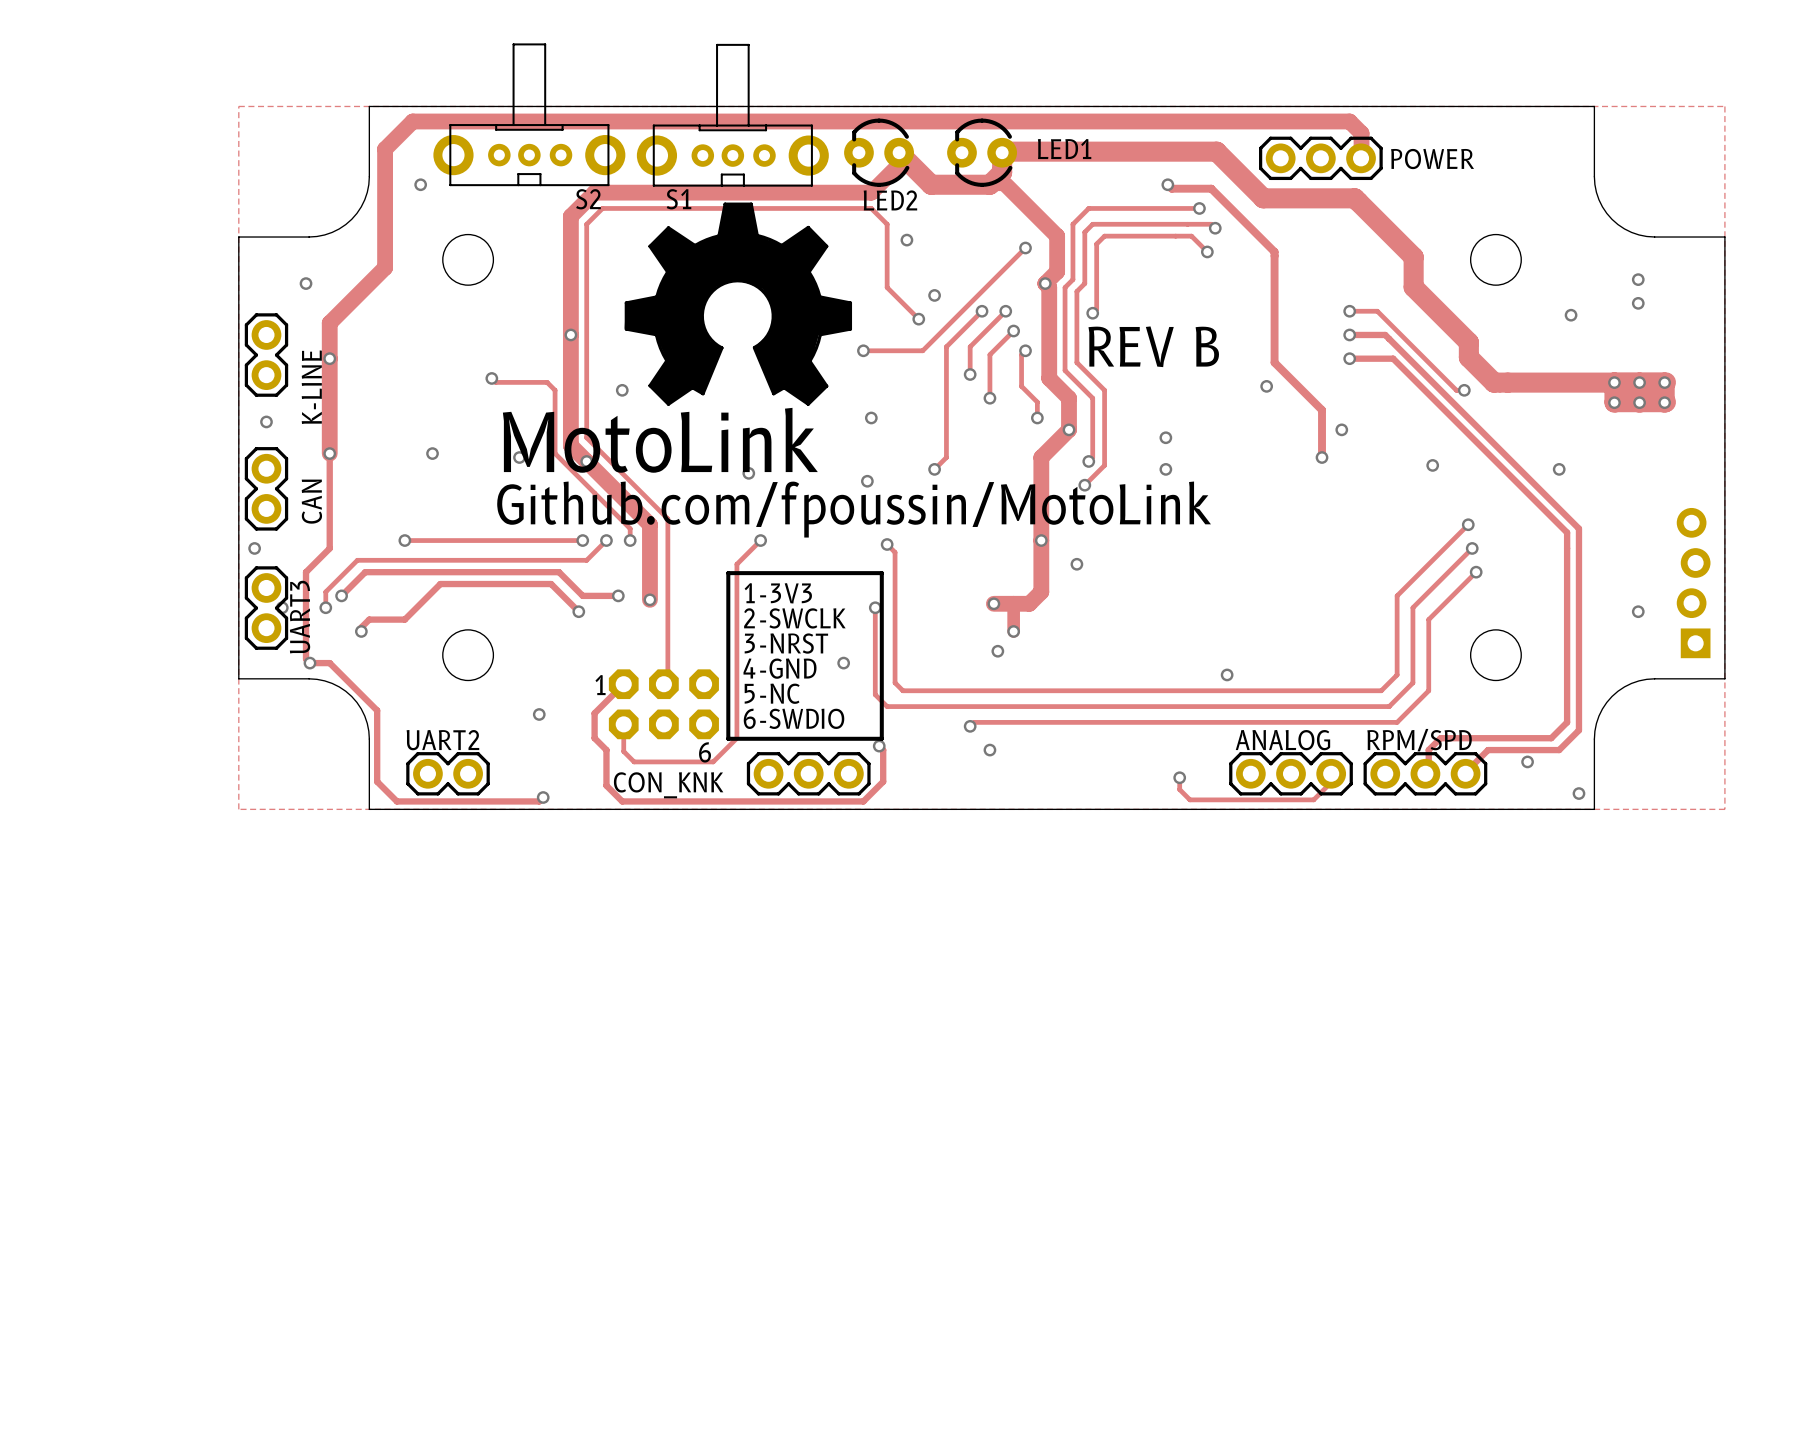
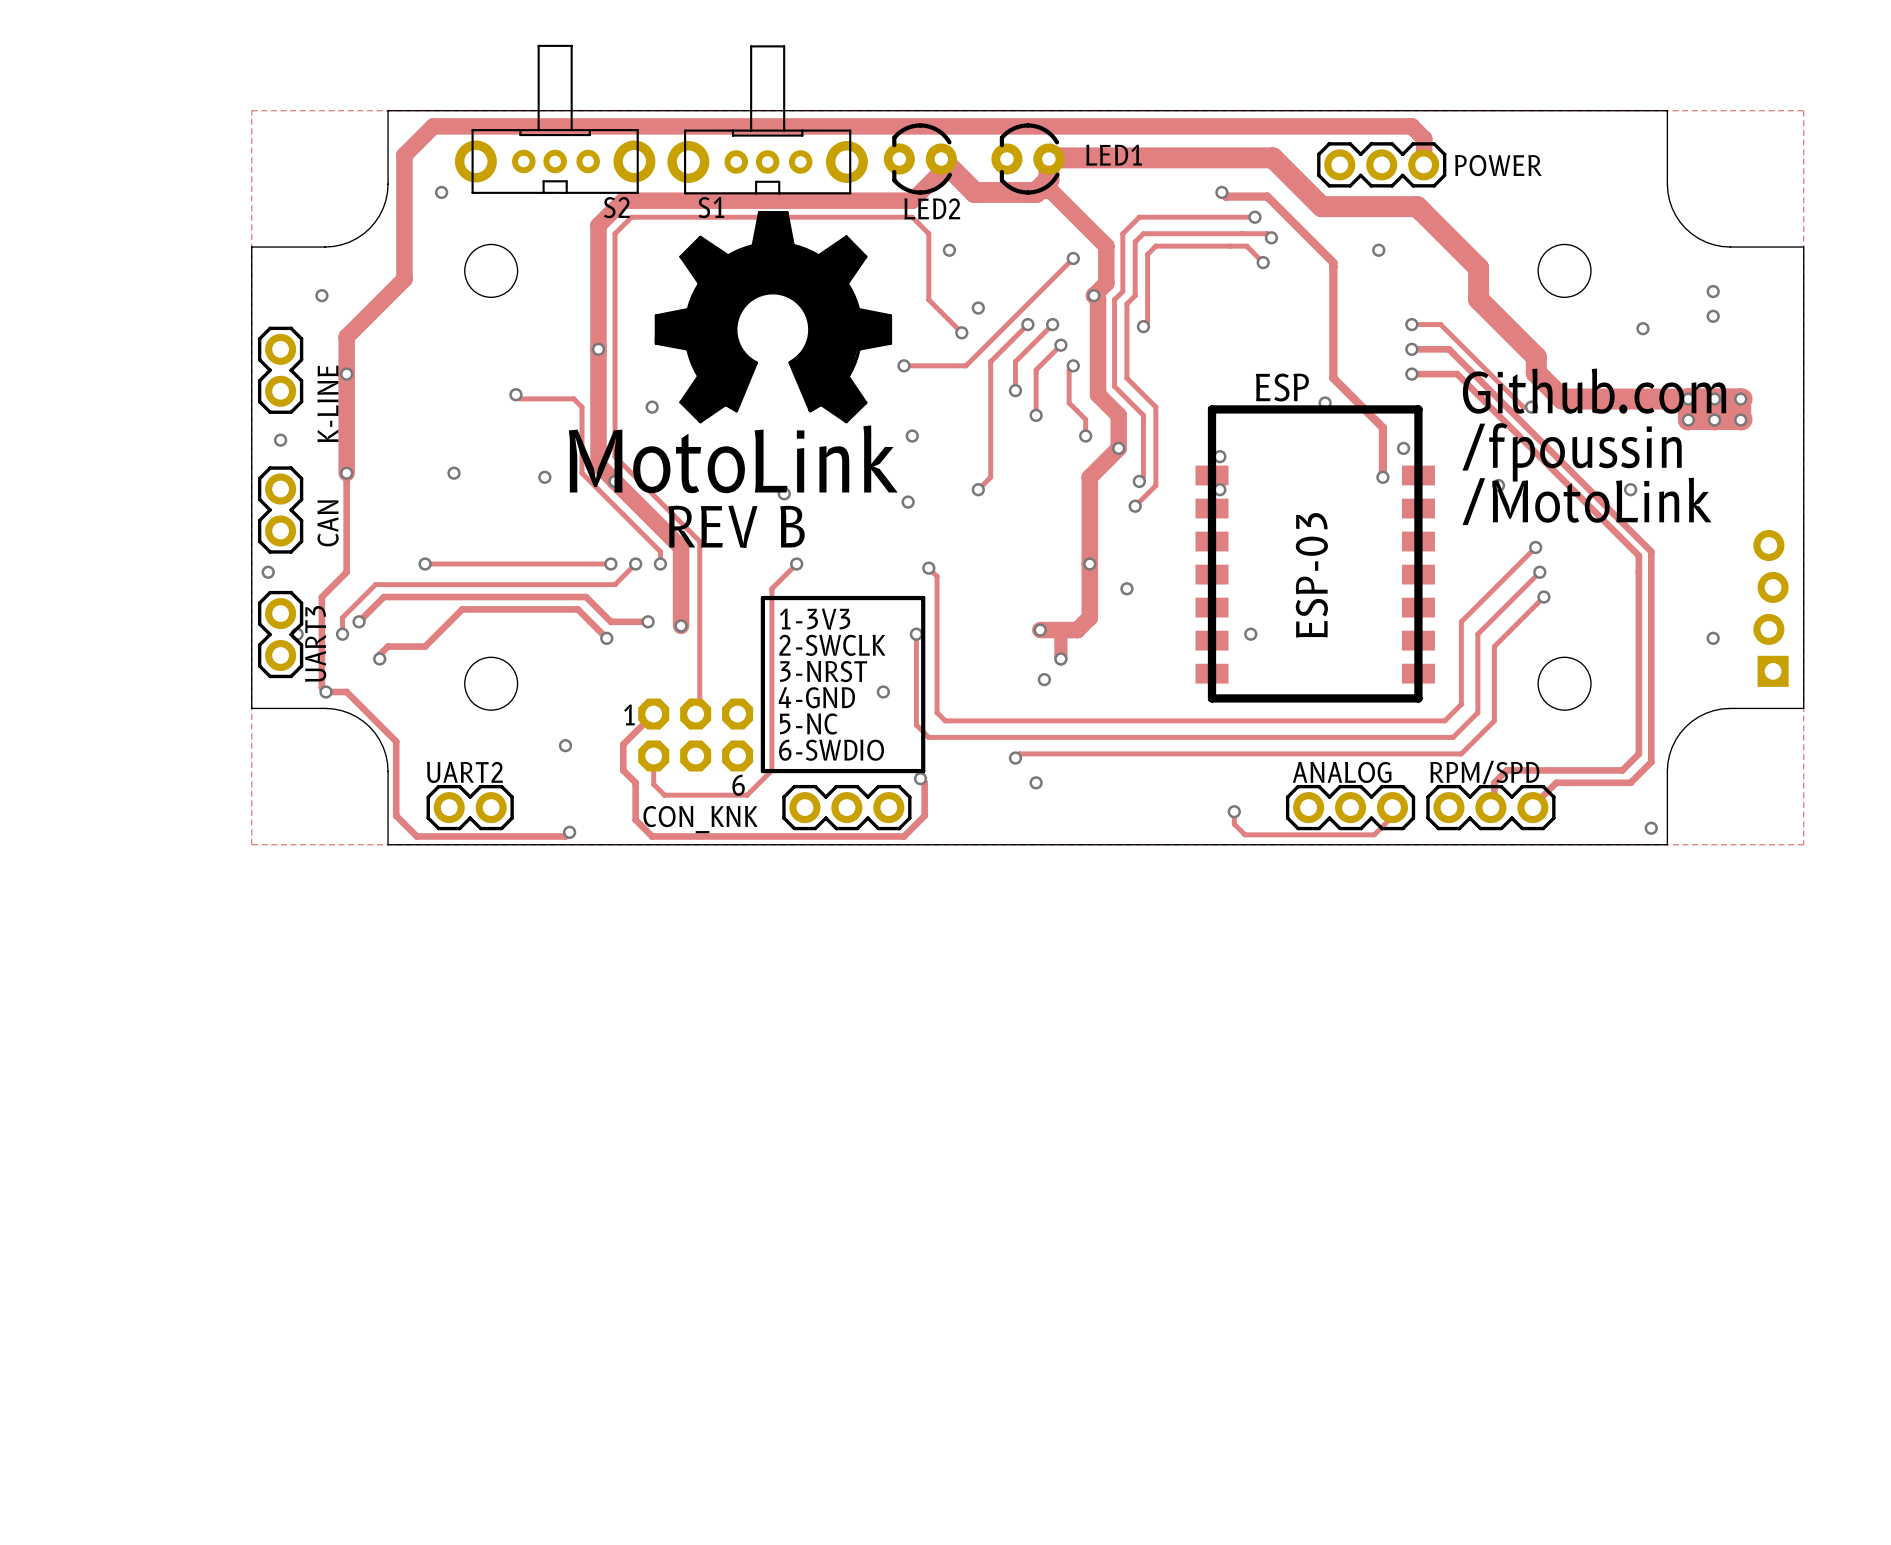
via: none -> (1378, 250)
text: REV B (1153, 346) -> none
text: none -> Github.com (1594, 391)
text: none -> /fpoussin (1572, 452)
text position: MotoLink (660, 440) -> MotoLink (733, 459)
text: none -> /MotoLink (1587, 501)
text: none -> REV B (736, 526)
text: Github.com/fpoussin/MotoLink (854, 509) -> none
ESP: none -> (1315, 553)
via position: (1227, 674) -> (1250, 634)
via: (1527, 761) -> none

